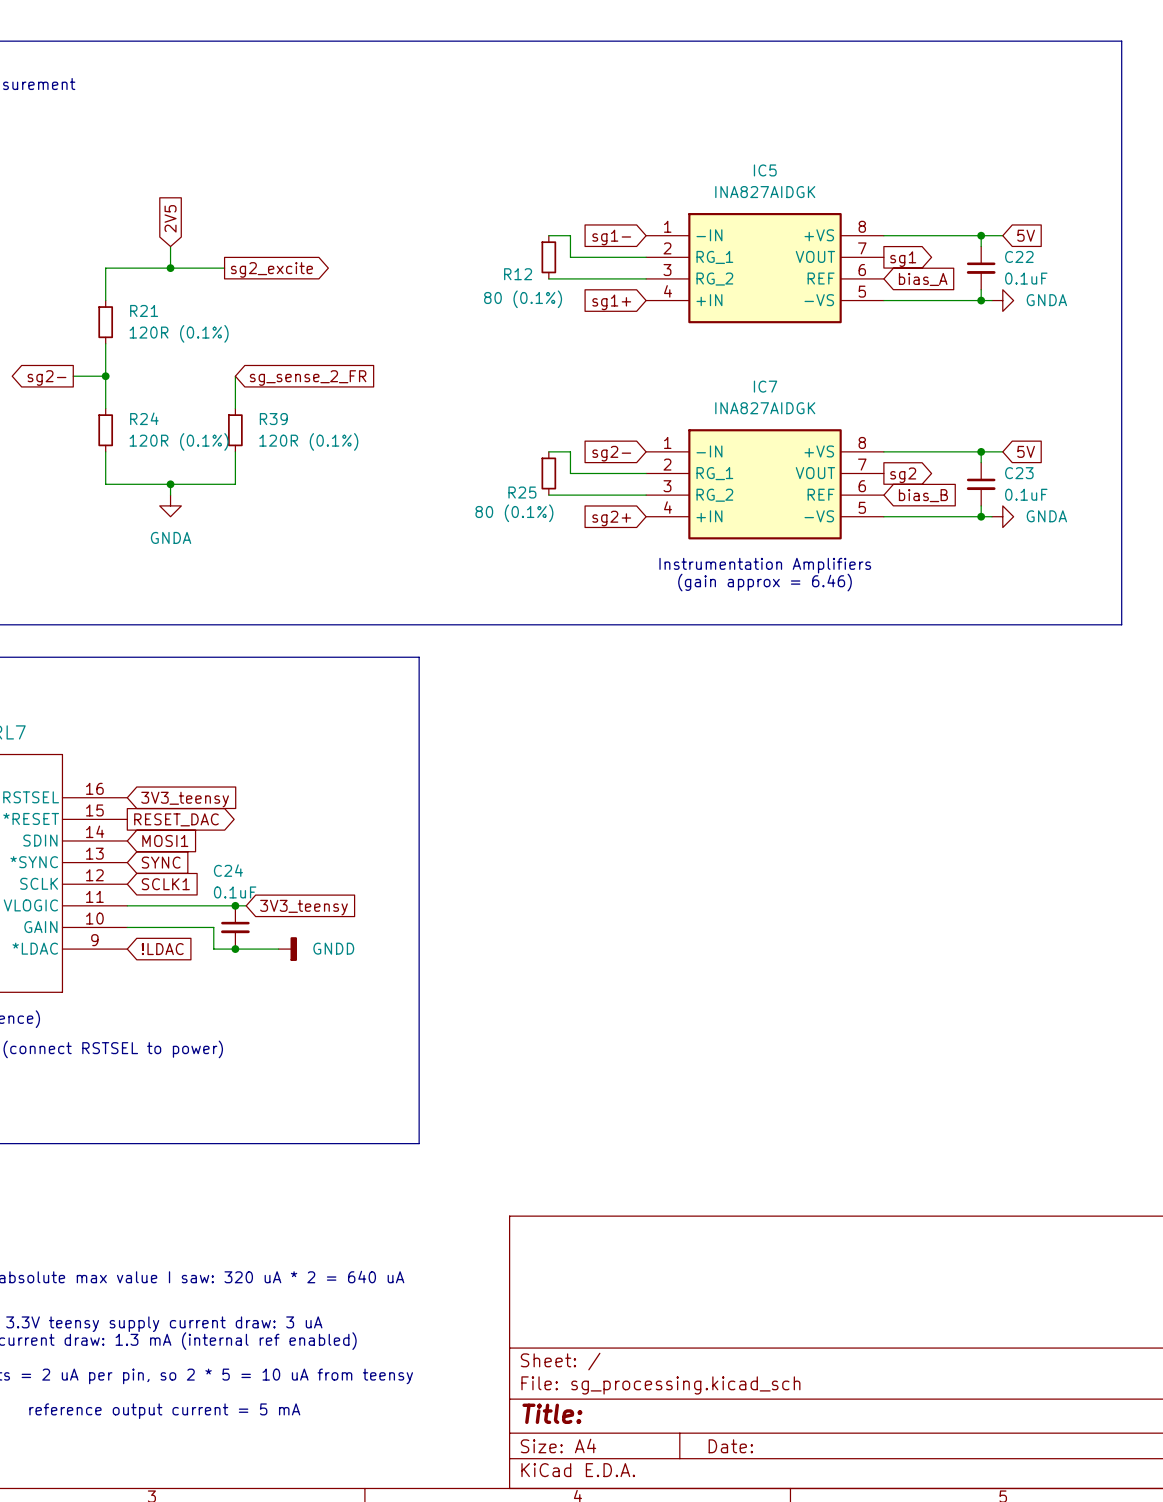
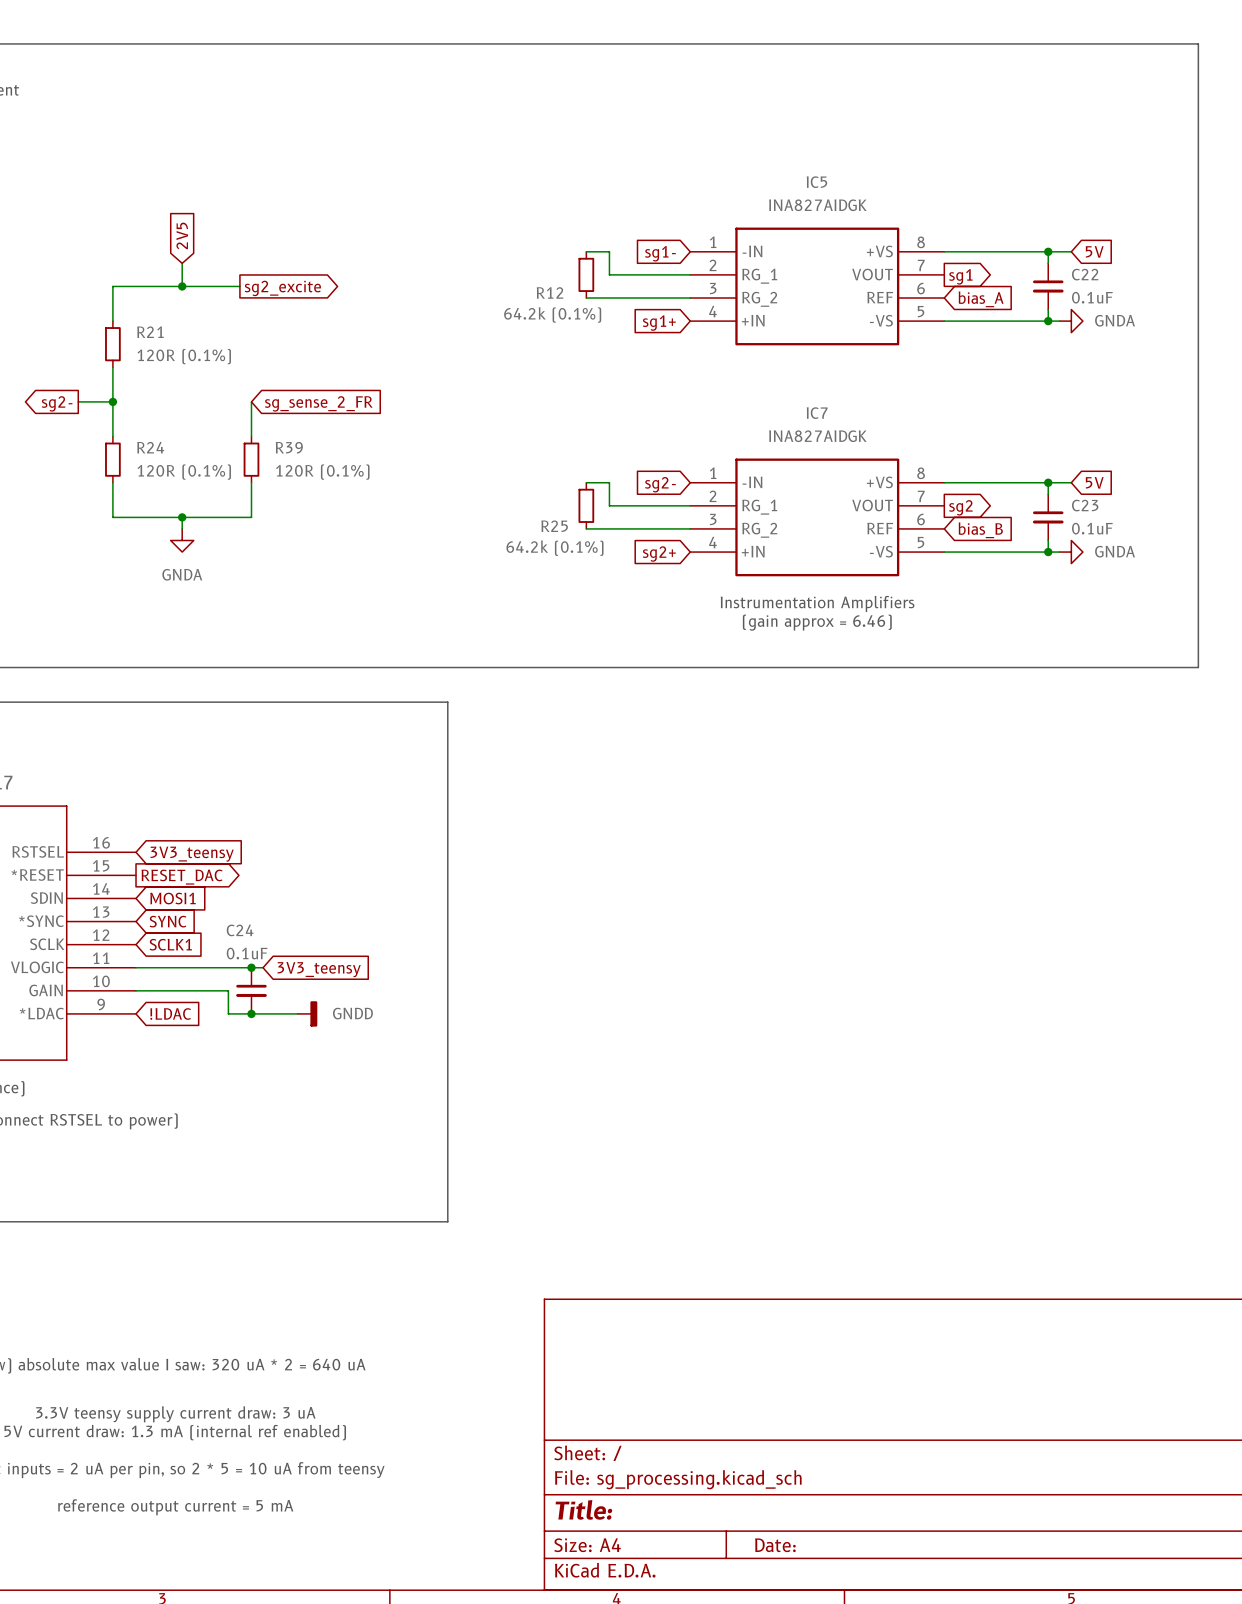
R12 value: 80 (0.1%) (523, 299) -> 64.2k (0.1%) (552, 314)
R25 value: 80 (0.1%) (514, 513) -> 64.2k (0.1%) (554, 548)

